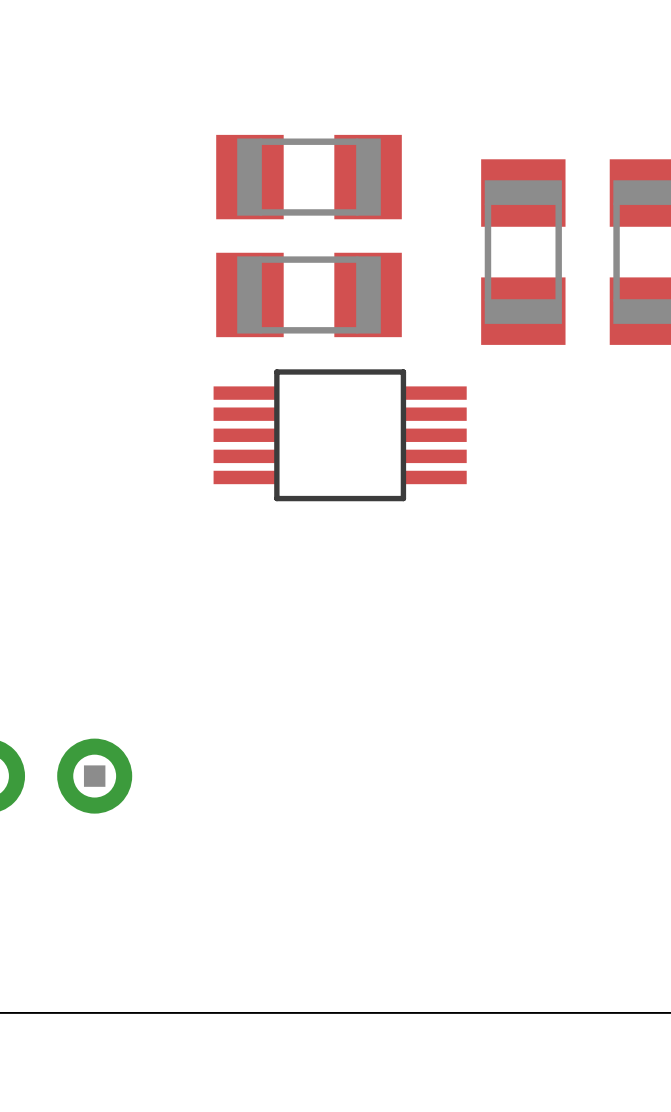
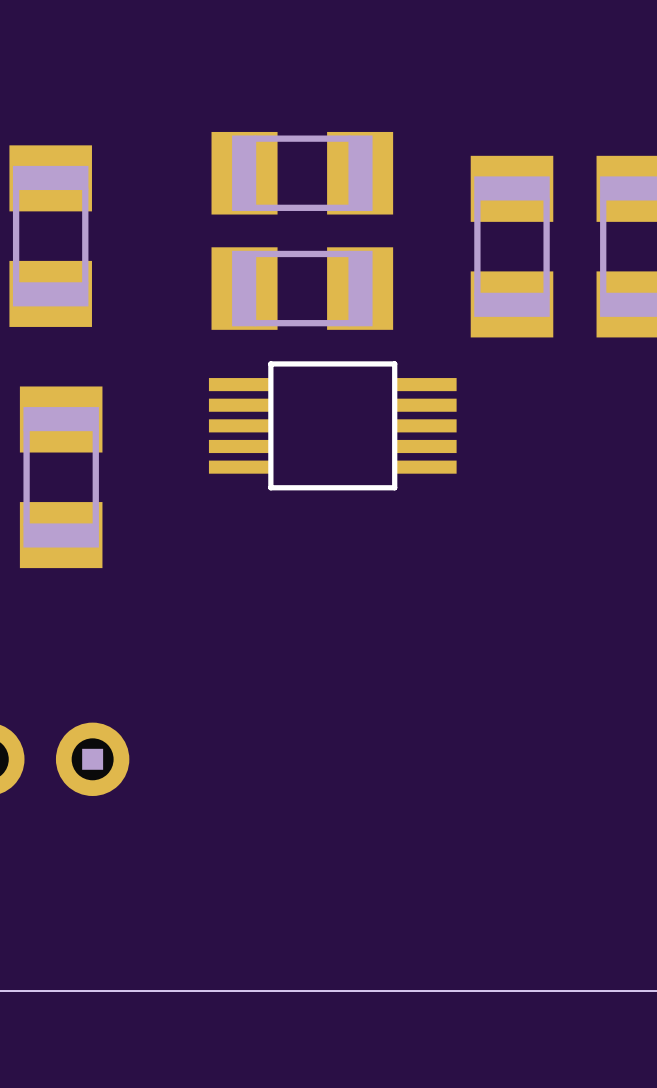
part: none -> (50, 236)
part: none -> (61, 477)

